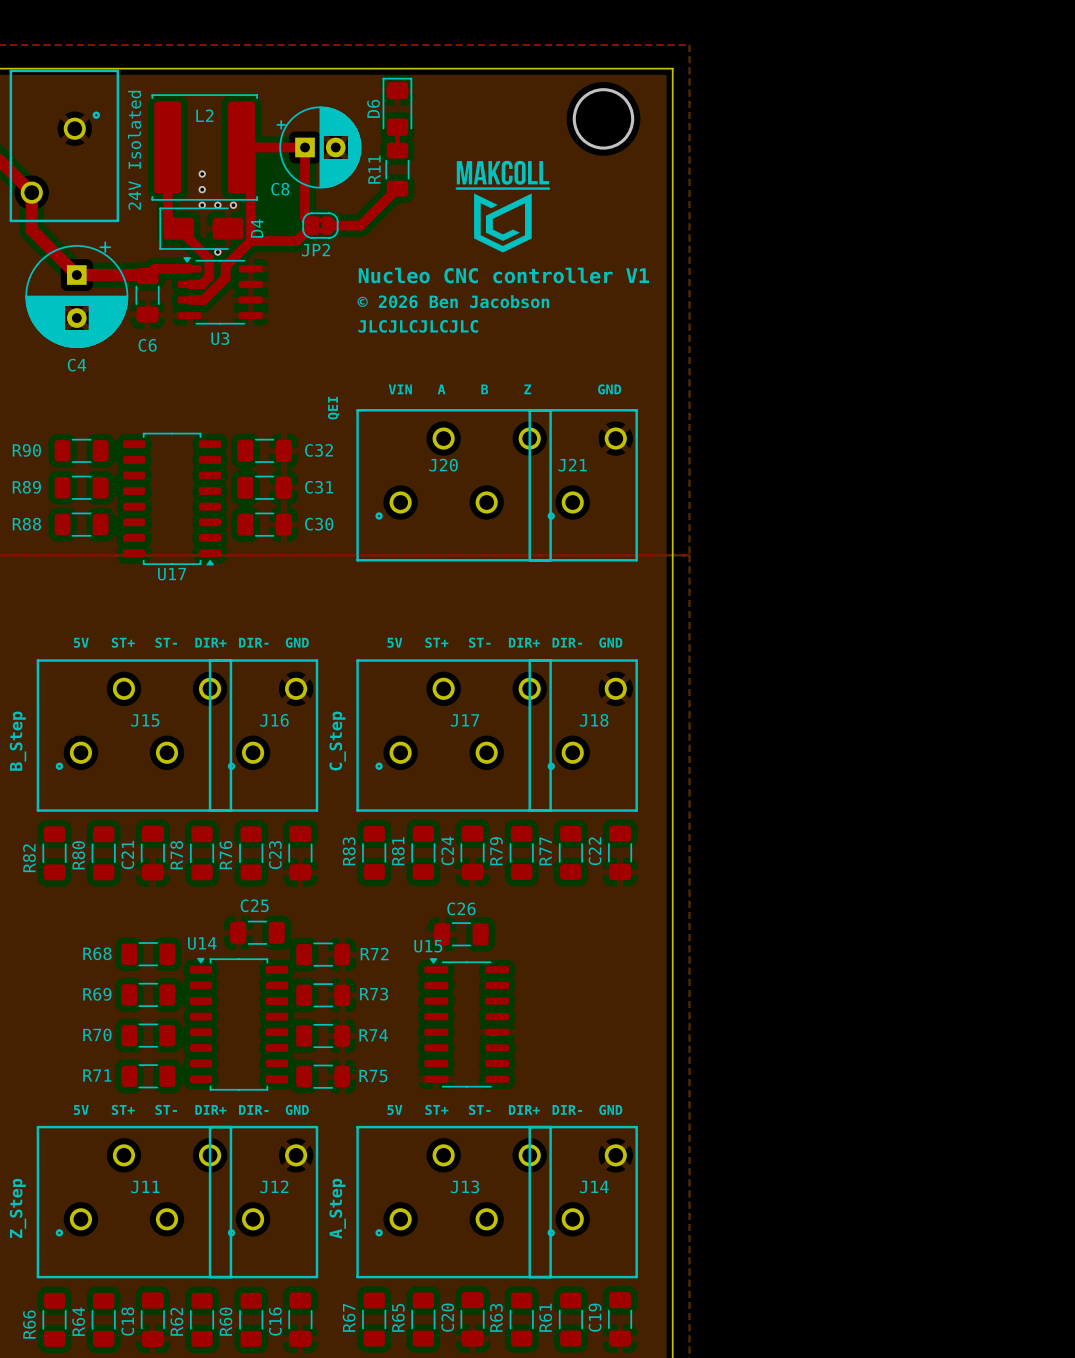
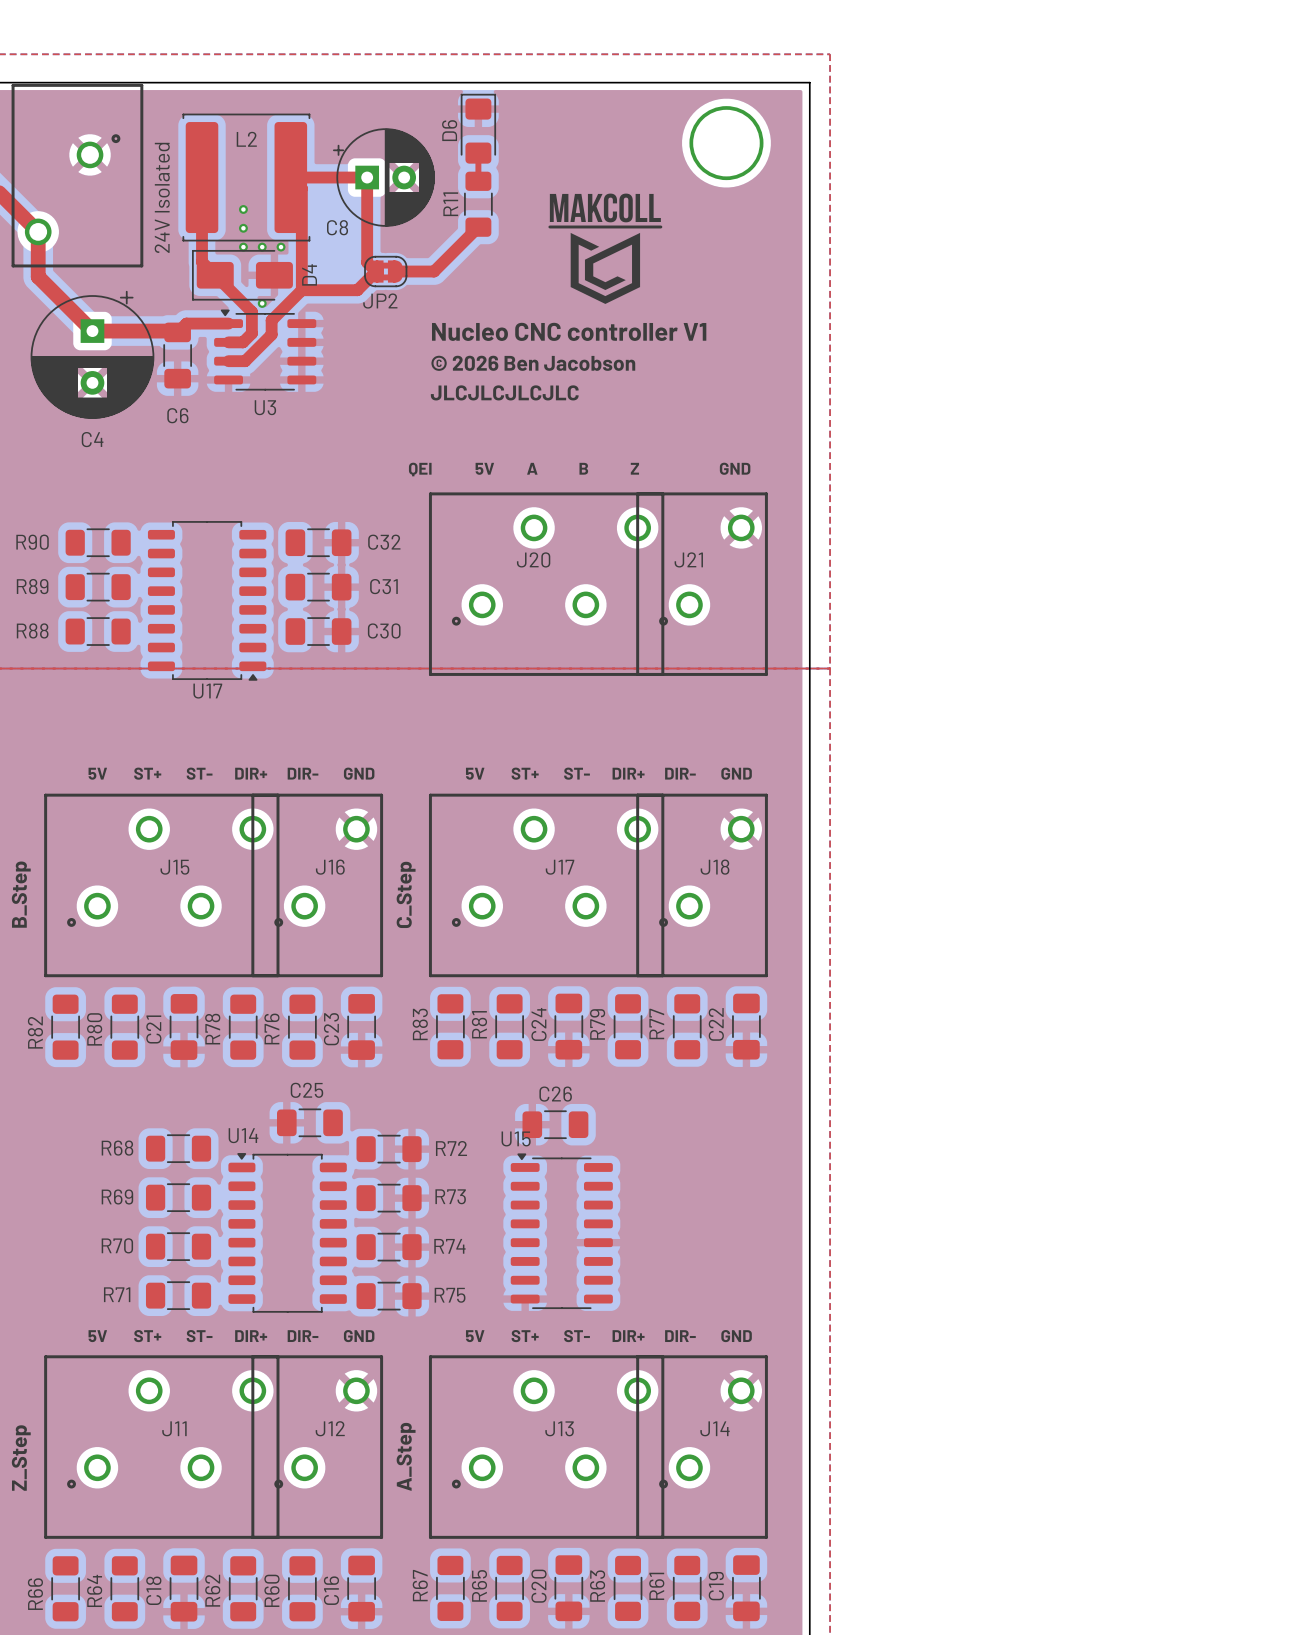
text: VIN (400, 389) -> 5V (484, 468)
text rotation: 0° (333, 408) -> 90° clockwise (420, 469)

